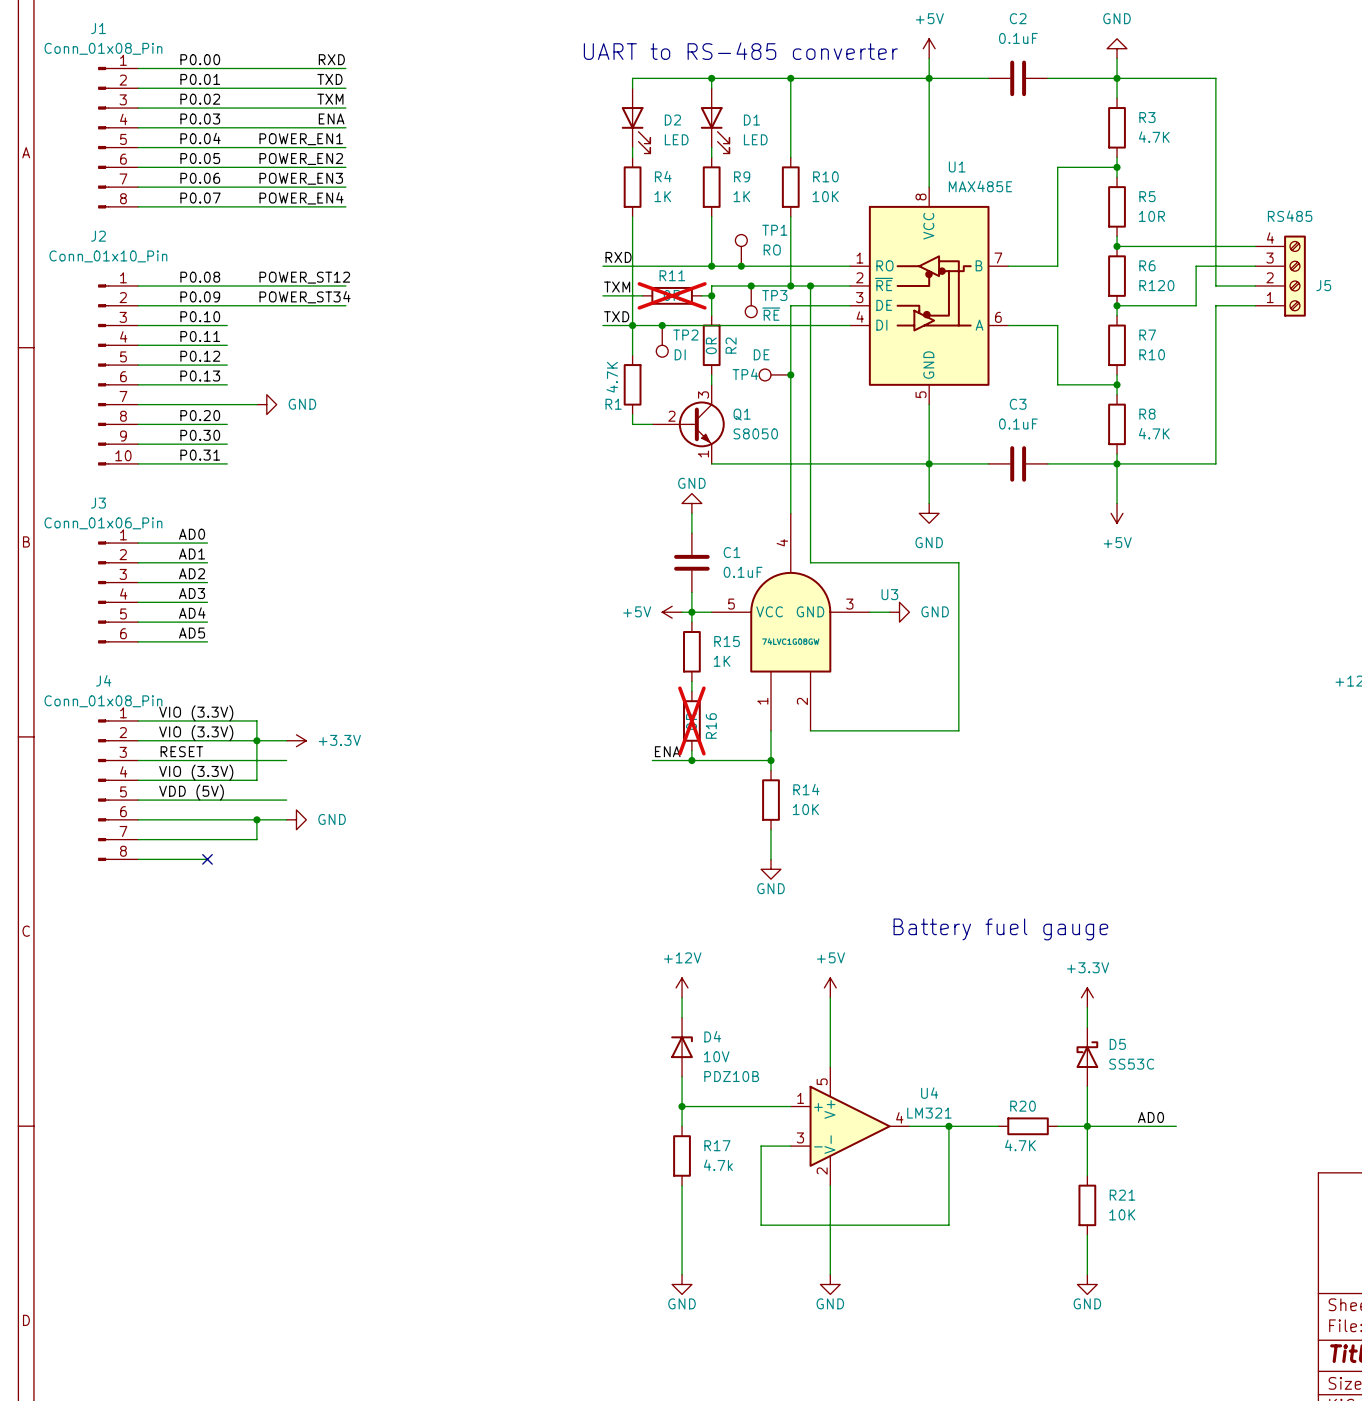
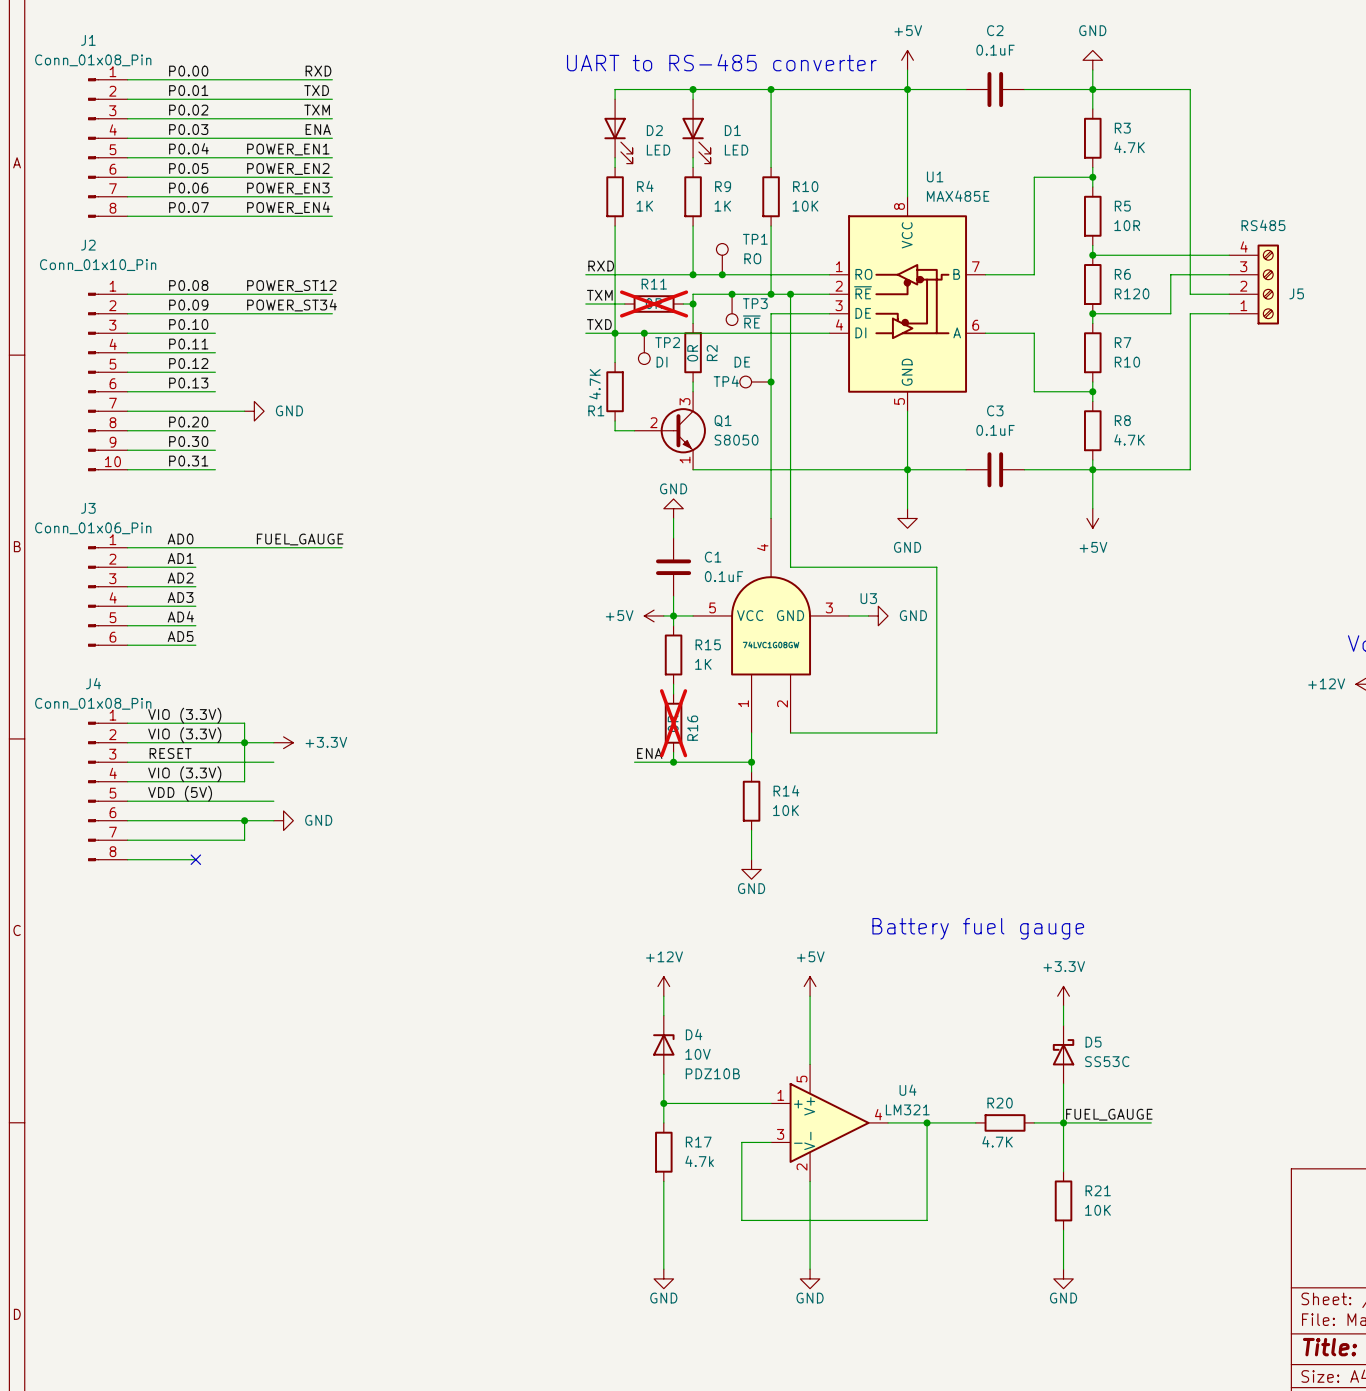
label: none -> FUEL_GAUGE (300, 539)
wire: none -> (195, 547) (342, 547)
label: none -> FUEL_GAUGE (1109, 1114)
label: AD0 (1150, 1117) -> none

